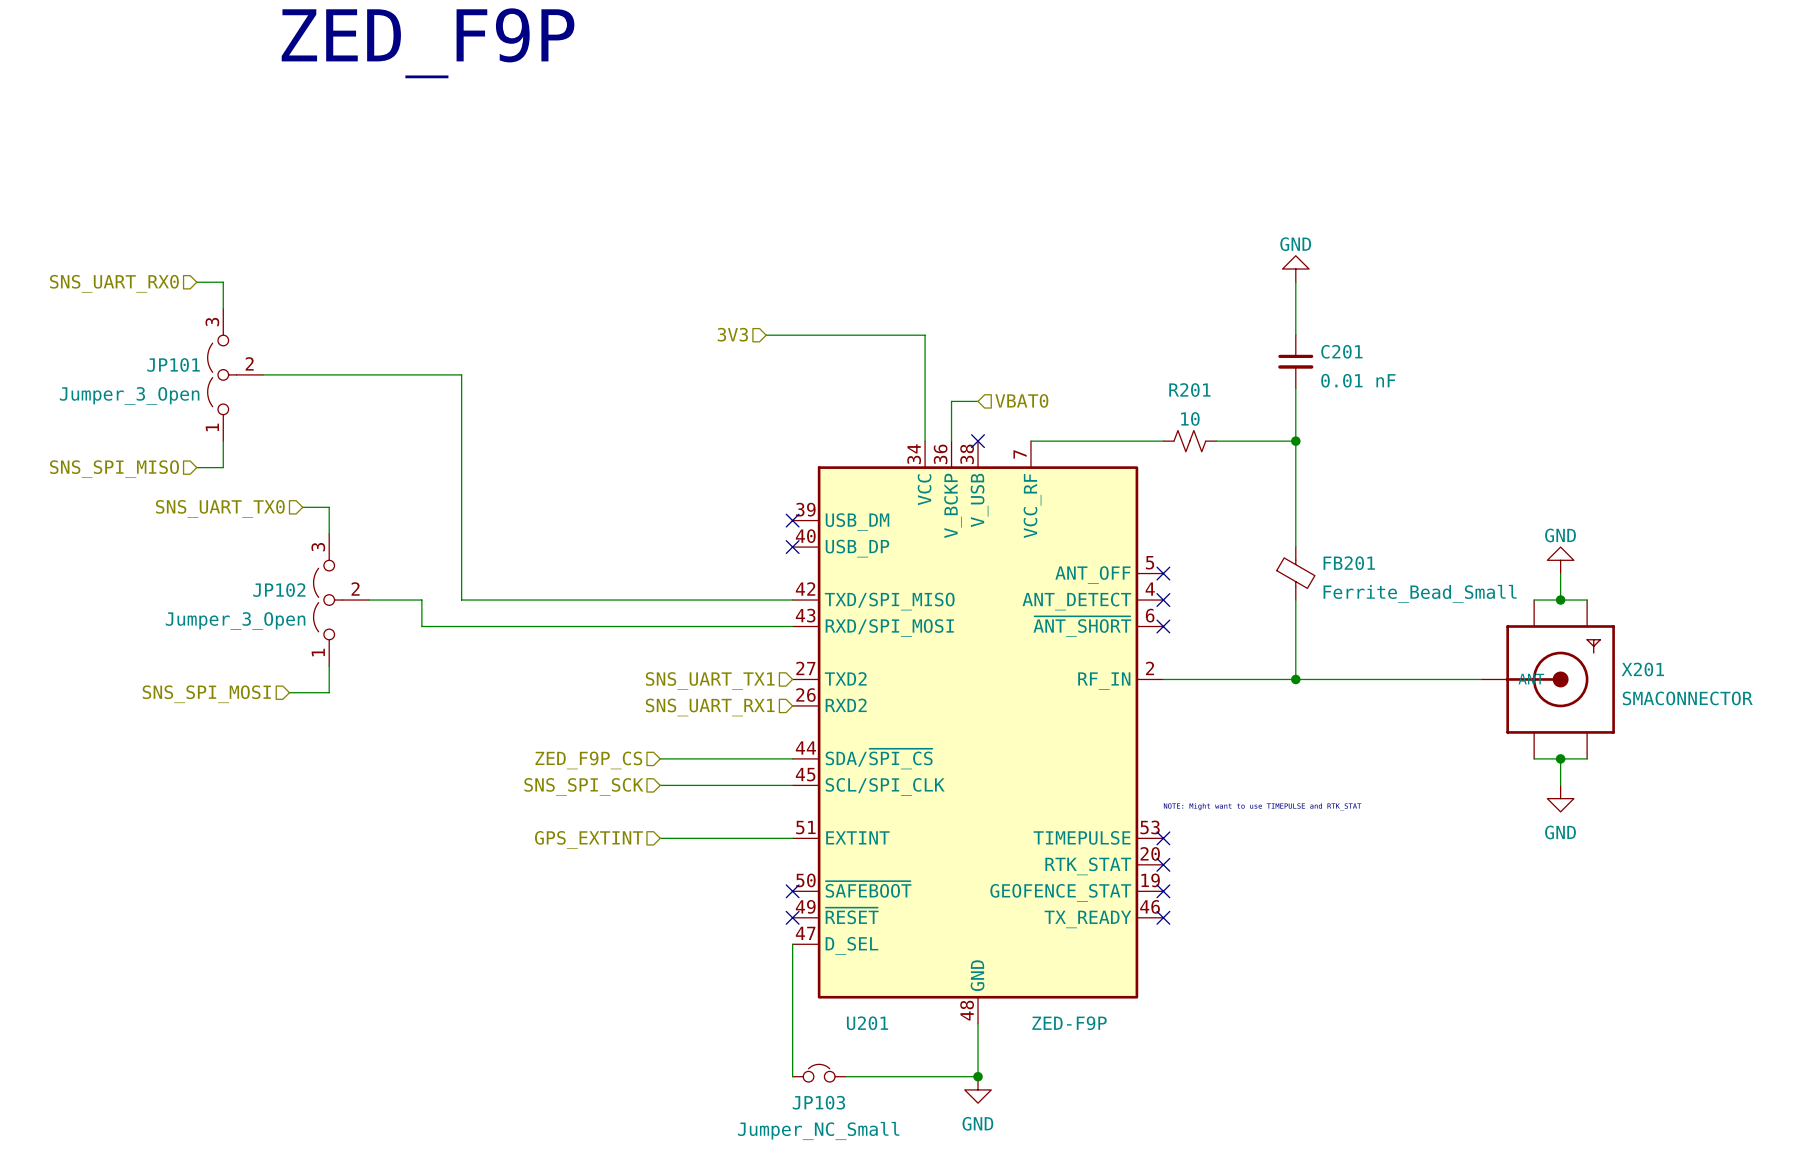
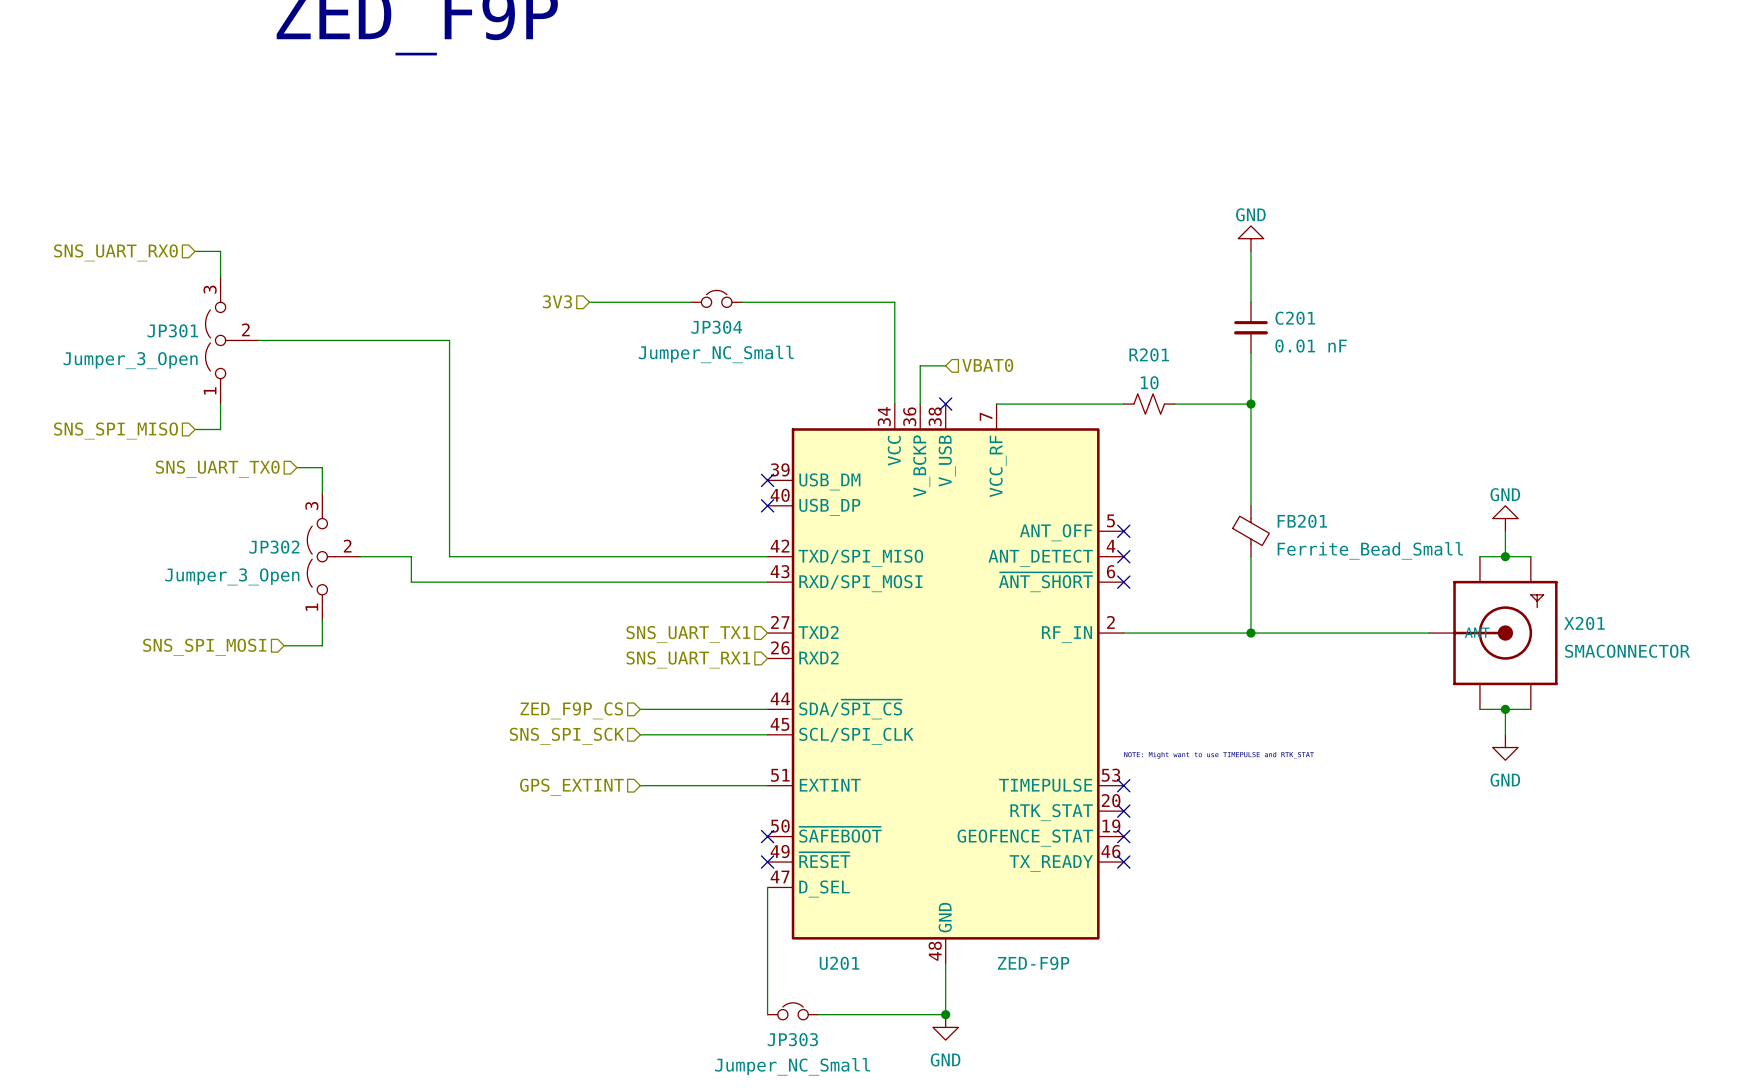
JP304: none -> Jumper_NC_Small (716, 298)
hierarchical label position: 3V3 (732, 334) -> 3V3 (557, 301)
wire: none -> (589, 302) (691, 302)
JP101 name: JP101 (173, 364) -> JP301 (172, 330)
JP102 name: JP102 (279, 590) -> JP302 (274, 547)
JP103 name: JP103 (818, 1102) -> JP303 (792, 1039)

